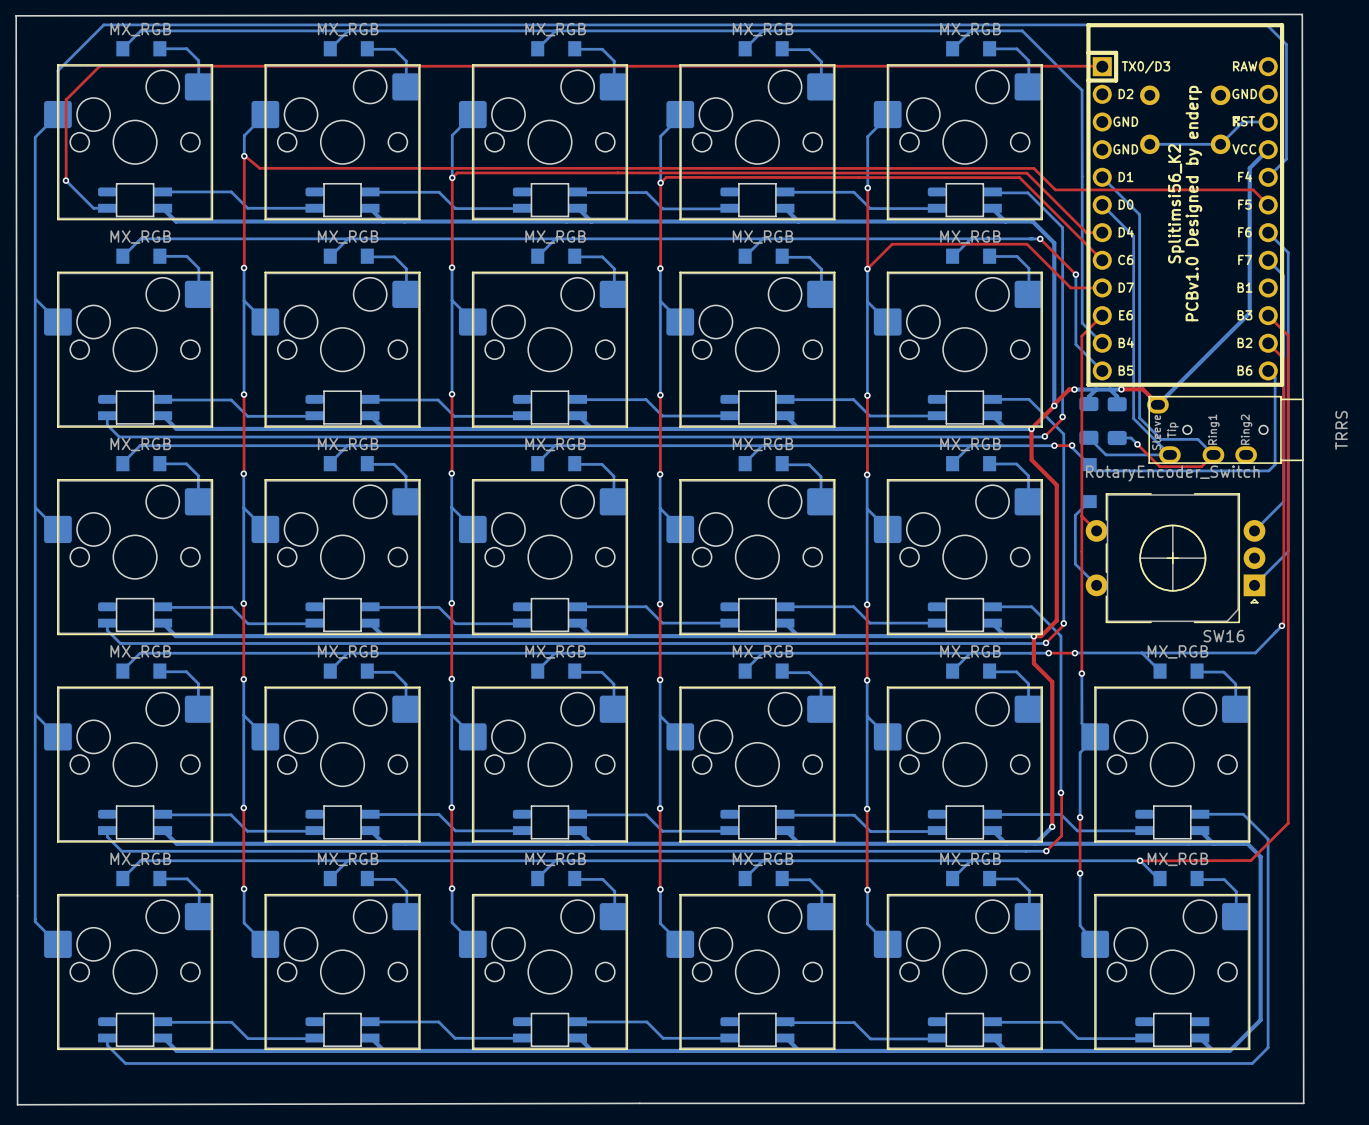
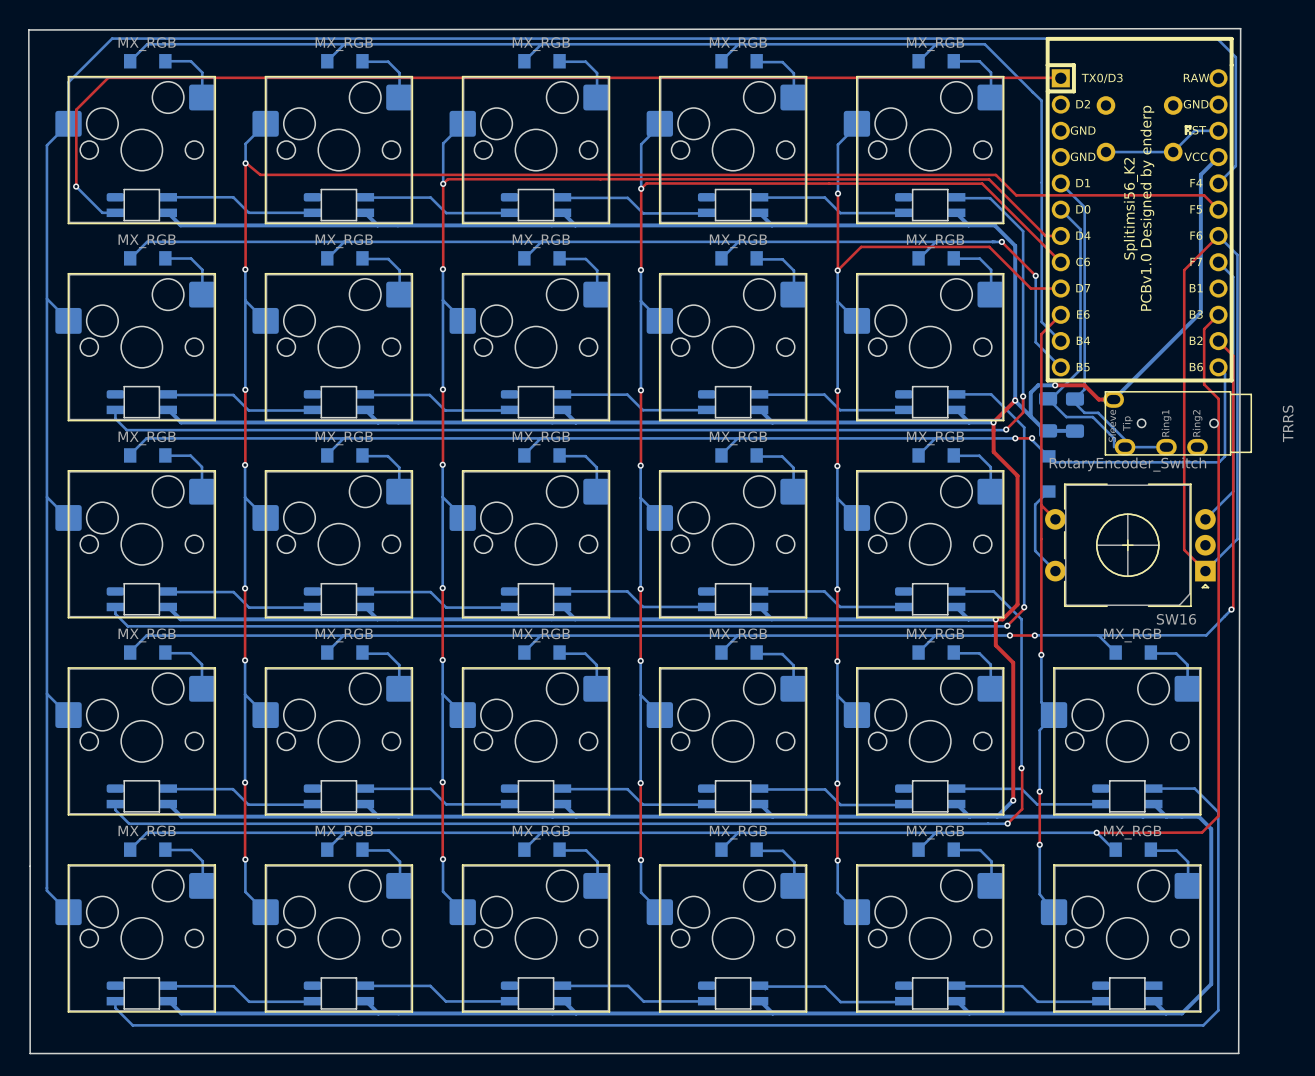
board edge: (1291, 14) (1302, 14) (1303, 1103) (17, 1104) (17, 1093) -> (1240, 28) (1238, 1053) (30, 1053)
bottom track: (1127, 202) (1139, 214) (1139, 417) (1161, 439) (1197, 439) (1213, 454) -> (1084, 207) (1084, 389) (1075, 399)
bottom track: (1123, 225) (1133, 236) (1133, 418) (1169, 454) (1106, 454) (1088, 437) -> (1080, 229) (1080, 369) (1051, 398) (1048, 398) (1066, 417) (1092, 417) (1114, 438) (1114, 447)
top track: none -> (1218, 235) (1184, 270) (1184, 549) (1205, 571)
top track: (1268, 315) (1288, 335) (1288, 823) (1268, 843) -> (1218, 314) (1204, 329) (1204, 384) (1218, 398) (1218, 815)
top track: (1074, 389) (1069, 389) (1054, 404) -> none
via: (1074, 389) -> none
top track: none -> (1055, 385) (1084, 385) (1098, 399) (1102, 399)
bottom track: (1096, 389) (1088, 396) (1088, 404) -> (1055, 385) (1038, 385) (1030, 392) (1030, 416)
via: none -> (1055, 385)
bottom track: (1110, 389) (1117, 396) (1117, 404) -> none
top track: (1121, 389) (1142, 389) (1157, 404) -> none
bottom track: (1121, 389) (1074, 389) -> none
via: (1121, 389) -> none
top track: none -> (1023, 396) (1023, 412)
via: none -> (1023, 396)
bottom track: none -> (1076, 404) (1084, 412) (1098, 412) (1132, 447) (1155, 447)
via: (1062, 416) -> none
bottom track: (1117, 438) (1131, 438) (1137, 444) -> (1074, 431) (1045, 430) (1015, 400)
top track: (1137, 444) (1159, 466) (1201, 466) (1213, 454) -> none
via: (1137, 444) -> none

